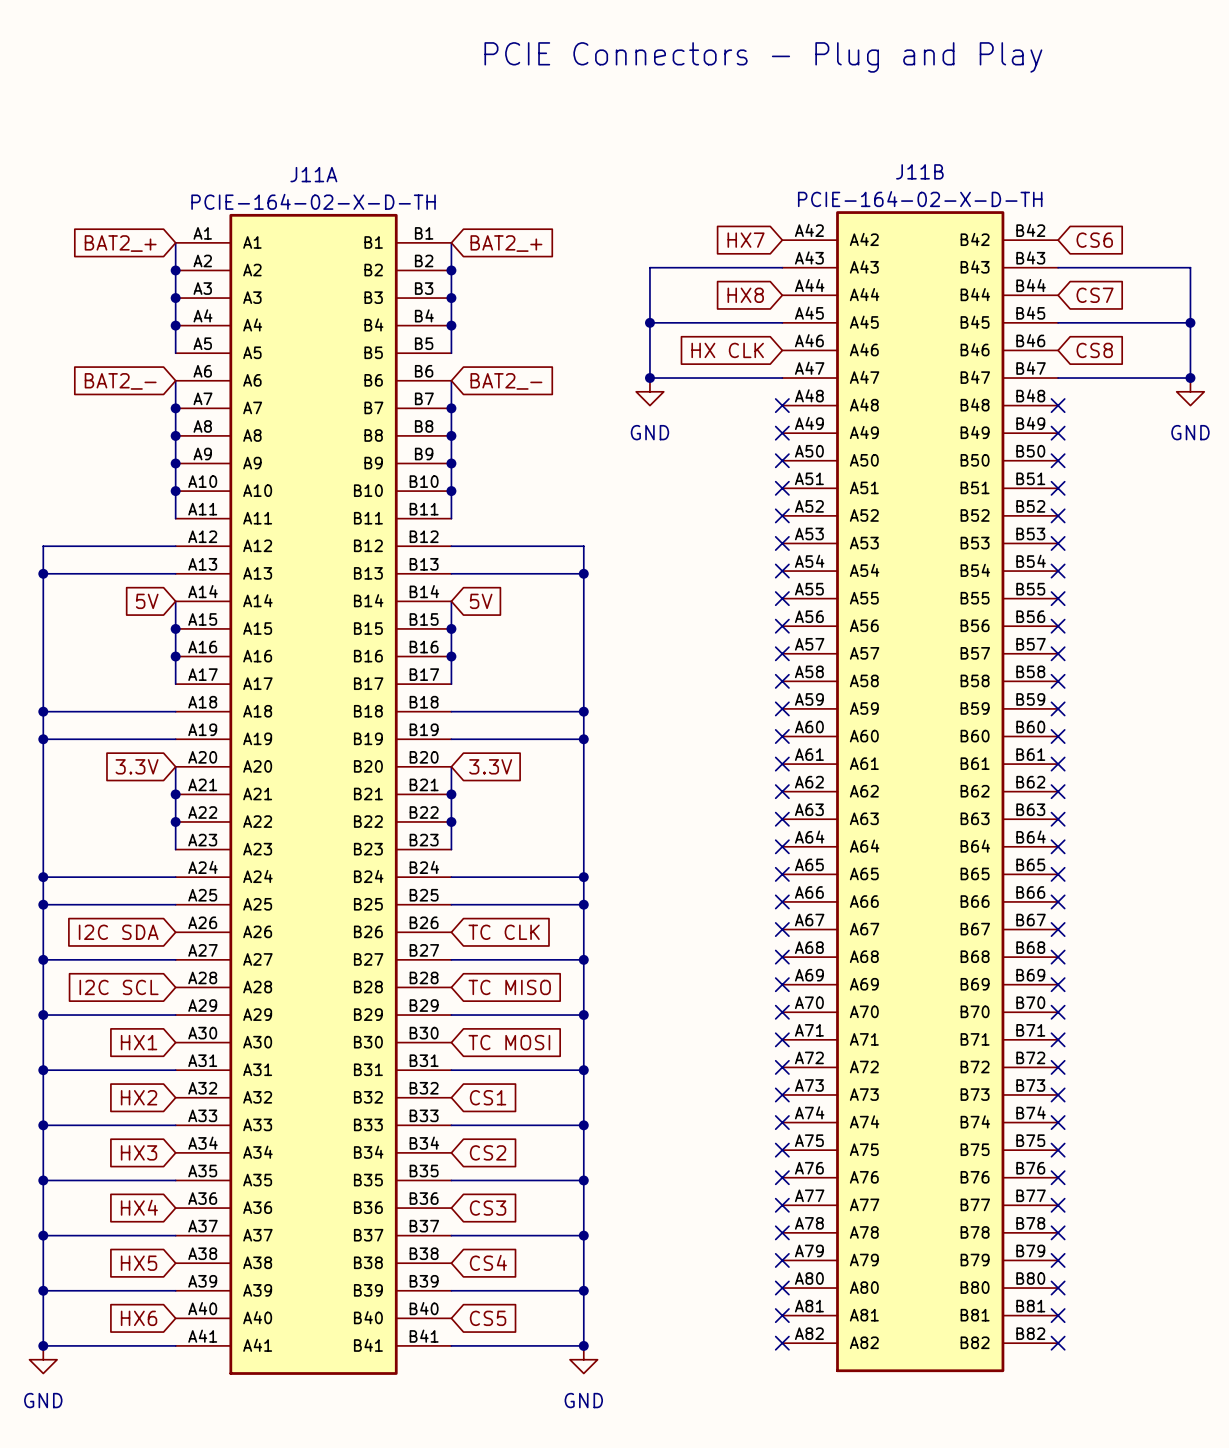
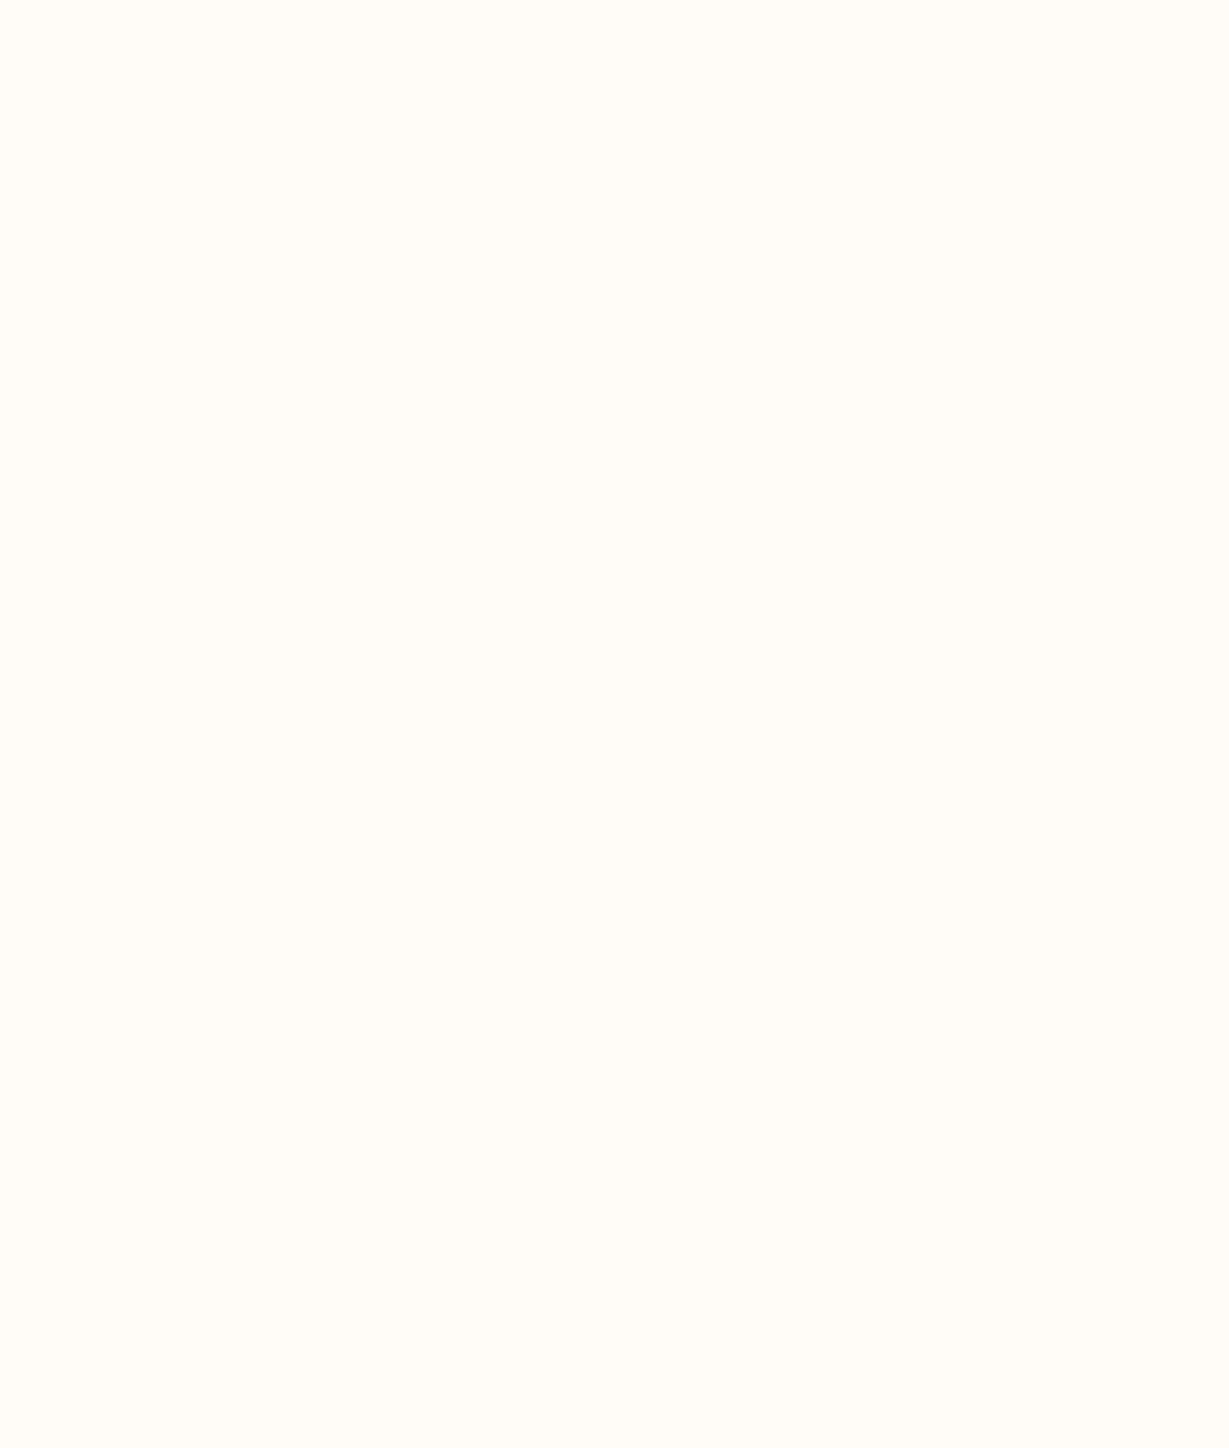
text: PCIE Connectors - Plug and Play (763, 57) -> none
global label: HX7 (746, 240) -> none
global label: CS6 (1094, 240) -> none
wire: (175, 242) (175, 353) -> none
wire: (451, 242) (451, 353) -> none
global label: BAT2_+ (120, 243) -> none
global label: BAT2_+ (506, 243) -> none
wire: (782, 267) (649, 267) (649, 378) (782, 378) -> none
wire: (1058, 267) (1190, 267) (1190, 378) (1058, 378) -> none
junction: (175, 270) -> none
junction: (451, 270) -> none
global label: HX8 (745, 295) -> none
global label: CS7 (1095, 295) -> none
junction: (175, 298) -> none
junction: (451, 298) -> none
wire: (649, 322) (782, 322) -> none
junction: (649, 322) -> none
wire: (1058, 322) (1190, 322) -> none
junction: (1190, 322) -> none
junction: (175, 325) -> none
junction: (451, 325) -> none
global label: HX CLK (727, 350) -> none
global label: CS8 (1094, 350) -> none
junction: (649, 378) -> none
junction: (1190, 378) -> none
wire: (175, 380) (175, 518) -> none
wire: (451, 380) (451, 518) -> none
global label: BAT2_- (120, 381) -> none
global label: BAT2_- (506, 381) -> none
power symbol: GND (649, 391) -> none
power symbol: GND (1190, 391) -> none
no-connect mark: (782, 405) -> none
no-connect mark: (1058, 405) -> none
junction: (175, 408) -> none
junction: (451, 408) -> none
no-connect mark: (782, 433) -> none
no-connect mark: (1058, 433) -> none
junction: (175, 435) -> none
junction: (451, 435) -> none
no-connect mark: (782, 460) -> none
no-connect mark: (1058, 460) -> none
junction: (175, 463) -> none
junction: (451, 463) -> none
no-connect mark: (782, 488) -> none
no-connect mark: (1058, 488) -> none
junction: (175, 491) -> none
junction: (451, 491) -> none
no-connect mark: (782, 515) -> none
no-connect mark: (1058, 515) -> none
no-connect mark: (782, 543) -> none
no-connect mark: (1058, 543) -> none
wire: (175, 546) (43, 546) (43, 1345) (175, 1345) -> none
wire: (451, 546) (583, 546) (583, 1345) (451, 1345) -> none
no-connect mark: (782, 571) -> none
no-connect mark: (1058, 571) -> none
wire: (43, 573) (175, 573) -> none
junction: (43, 573) -> none
wire: (451, 573) (583, 573) -> none
junction: (583, 573) -> none
no-connect mark: (782, 598) -> none
no-connect mark: (1058, 598) -> none
global label: 5V (147, 601) -> none
wire: (175, 601) (175, 684) -> none
wire: (451, 601) (451, 684) -> none
global label: 5V (481, 601) -> none
no-connect mark: (782, 626) -> none
no-connect mark: (1058, 626) -> none
junction: (175, 628) -> none
junction: (451, 628) -> none
no-connect mark: (782, 653) -> none
no-connect mark: (1058, 653) -> none
junction: (175, 656) -> none
junction: (451, 656) -> none
no-connect mark: (782, 681) -> none
no-connect mark: (1058, 681) -> none
no-connect mark: (782, 708) -> none
no-connect mark: (1058, 708) -> none
wire: (43, 711) (175, 711) -> none
junction: (43, 711) -> none
wire: (451, 711) (583, 711) -> none
junction: (583, 711) -> none
no-connect mark: (782, 736) -> none
no-connect mark: (1058, 736) -> none
wire: (43, 739) (175, 739) -> none
junction: (43, 739) -> none
wire: (451, 739) (583, 739) -> none
junction: (583, 739) -> none
no-connect mark: (782, 764) -> none
no-connect mark: (1058, 764) -> none
global label: 3.3V (137, 766) -> none
wire: (175, 766) (175, 849) -> none
wire: (451, 766) (451, 849) -> none
global label: 3.3V (490, 766) -> none
no-connect mark: (782, 791) -> none
J11B: PCIE-164-02-X-D-TH (920, 791) -> none
no-connect mark: (1058, 791) -> none
junction: (175, 794) -> none
J11A: PCIE-164-02-X-D-TH (313, 794) -> none
junction: (451, 794) -> none
no-connect mark: (782, 819) -> none
no-connect mark: (1058, 819) -> none
junction: (175, 821) -> none
junction: (451, 821) -> none
no-connect mark: (782, 846) -> none
no-connect mark: (1058, 846) -> none
no-connect mark: (782, 874) -> none
no-connect mark: (1058, 874) -> none
wire: (43, 877) (175, 877) -> none
junction: (43, 877) -> none
wire: (451, 877) (583, 877) -> none
junction: (583, 877) -> none
no-connect mark: (782, 901) -> none
no-connect mark: (1058, 901) -> none
wire: (43, 904) (175, 904) -> none
junction: (43, 904) -> none
wire: (451, 904) (583, 904) -> none
junction: (583, 904) -> none
no-connect mark: (782, 929) -> none
no-connect mark: (1058, 929) -> none
global label: I2C SDA (118, 932) -> none
global label: TC CLK (504, 932) -> none
no-connect mark: (782, 957) -> none
no-connect mark: (1058, 957) -> none
wire: (43, 959) (175, 959) -> none
junction: (43, 959) -> none
wire: (451, 959) (583, 959) -> none
junction: (583, 959) -> none
no-connect mark: (782, 984) -> none
no-connect mark: (1058, 984) -> none
global label: I2C SCL (119, 987) -> none
global label: TC MISO (509, 987) -> none
no-connect mark: (782, 1012) -> none
no-connect mark: (1058, 1012) -> none
wire: (43, 1015) (175, 1015) -> none
junction: (43, 1015) -> none
wire: (451, 1015) (583, 1015) -> none
junction: (583, 1015) -> none
no-connect mark: (782, 1039) -> none
no-connect mark: (1058, 1039) -> none
global label: HX1 (139, 1042) -> none
global label: TC MOSI (509, 1042) -> none
no-connect mark: (782, 1067) -> none
no-connect mark: (1058, 1067) -> none
wire: (43, 1070) (175, 1070) -> none
junction: (43, 1070) -> none
wire: (451, 1070) (583, 1070) -> none
junction: (583, 1070) -> none
no-connect mark: (782, 1094) -> none
no-connect mark: (1058, 1094) -> none
global label: HX2 (139, 1097) -> none
global label: CS1 (488, 1097) -> none
no-connect mark: (782, 1122) -> none
no-connect mark: (1058, 1122) -> none
wire: (43, 1125) (175, 1125) -> none
junction: (43, 1125) -> none
wire: (451, 1125) (583, 1125) -> none
junction: (583, 1125) -> none
no-connect mark: (782, 1150) -> none
no-connect mark: (1058, 1150) -> none
global label: HX3 (139, 1152) -> none
global label: CS2 (488, 1152) -> none
no-connect mark: (782, 1177) -> none
no-connect mark: (1058, 1177) -> none
wire: (43, 1180) (175, 1180) -> none
junction: (43, 1180) -> none
wire: (451, 1180) (583, 1180) -> none
junction: (583, 1180) -> none
no-connect mark: (782, 1205) -> none
no-connect mark: (1058, 1205) -> none
global label: HX4 (139, 1207) -> none
global label: CS3 (488, 1208) -> none
no-connect mark: (782, 1232) -> none
no-connect mark: (1058, 1232) -> none
wire: (43, 1235) (175, 1235) -> none
junction: (43, 1235) -> none
wire: (451, 1235) (583, 1235) -> none
junction: (583, 1235) -> none
no-connect mark: (782, 1260) -> none
no-connect mark: (1058, 1260) -> none
global label: CS4 (488, 1262) -> none
global label: HX5 (139, 1263) -> none
no-connect mark: (782, 1288) -> none
no-connect mark: (1058, 1288) -> none
wire: (43, 1290) (175, 1290) -> none
junction: (43, 1290) -> none
wire: (451, 1290) (583, 1290) -> none
junction: (583, 1290) -> none
no-connect mark: (782, 1315) -> none
no-connect mark: (1058, 1315) -> none
global label: HX6 (139, 1318) -> none
global label: CS5 (488, 1318) -> none
no-connect mark: (782, 1343) -> none
no-connect mark: (1058, 1343) -> none
junction: (43, 1345) -> none
junction: (583, 1345) -> none
power symbol: GND (43, 1359) -> none
power symbol: GND (583, 1359) -> none

